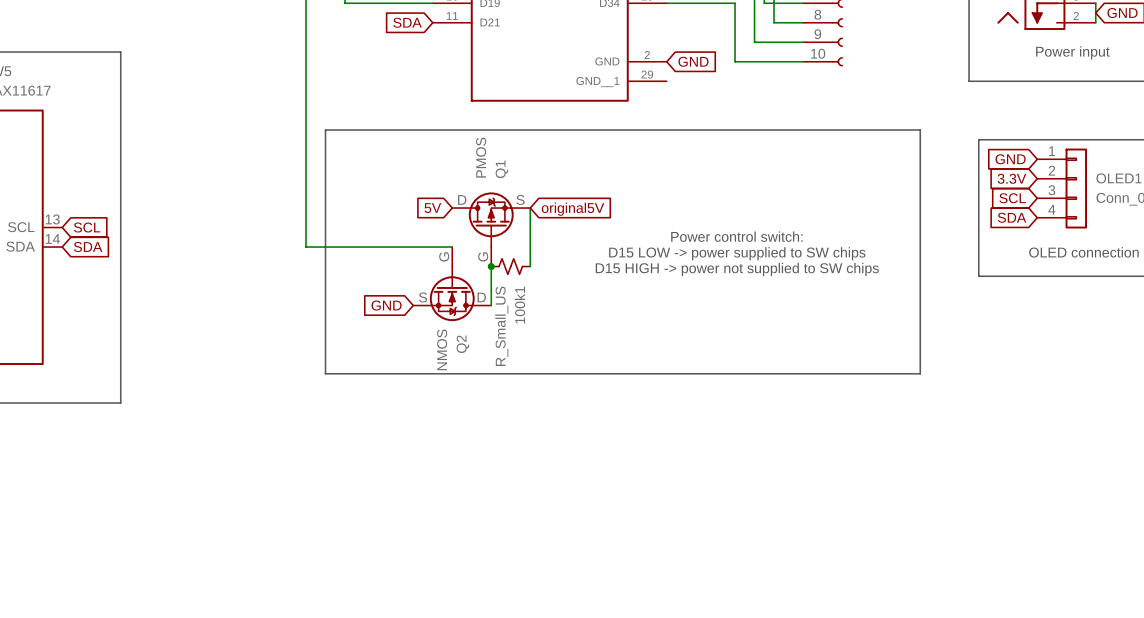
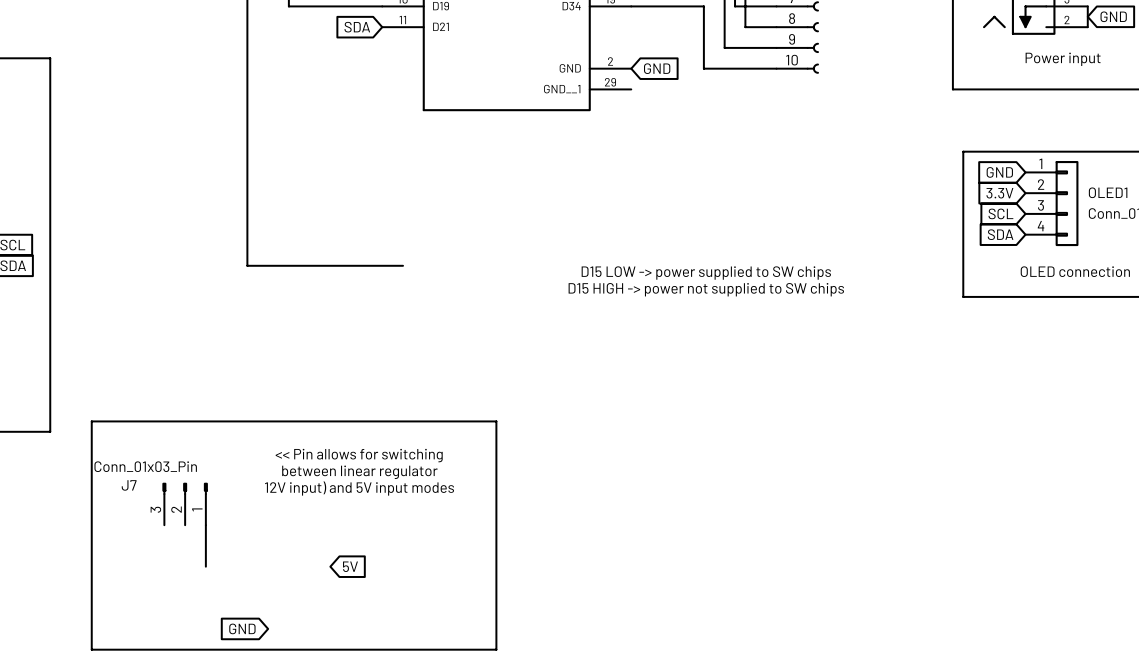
line: (325, 130) (920, 130) (920, 373) (325, 373) (325, 130) -> none
global label: 5V (432, 208) -> none
wire: (530, 208) (530, 266) -> none
global label: original5V (573, 209) -> none
Q1: PMOS (491, 229) -> none
text: Power control switch: (736, 236) -> none
wire: (491, 266) (491, 305) -> none
junction: (491, 266) -> none
100k1: R_Small_US (510, 266) -> none
Q2: NMOS (452, 284) -> none
global label: GND (386, 305) -> none
line: none -> (91, 421) (496, 421) (496, 649) (91, 649) (91, 421)
text: none -> << Pin allows for switching (359, 455)
text: none -> between linear regulator (359, 472)
text: none -> 12V input) and 5V input modes (359, 488)
J7: none -> Conn_01x03_Pin (185, 504)
wire: none -> (205, 525) (205, 566)
global label: none -> 5V (350, 566)
global label: none -> GND (242, 628)

